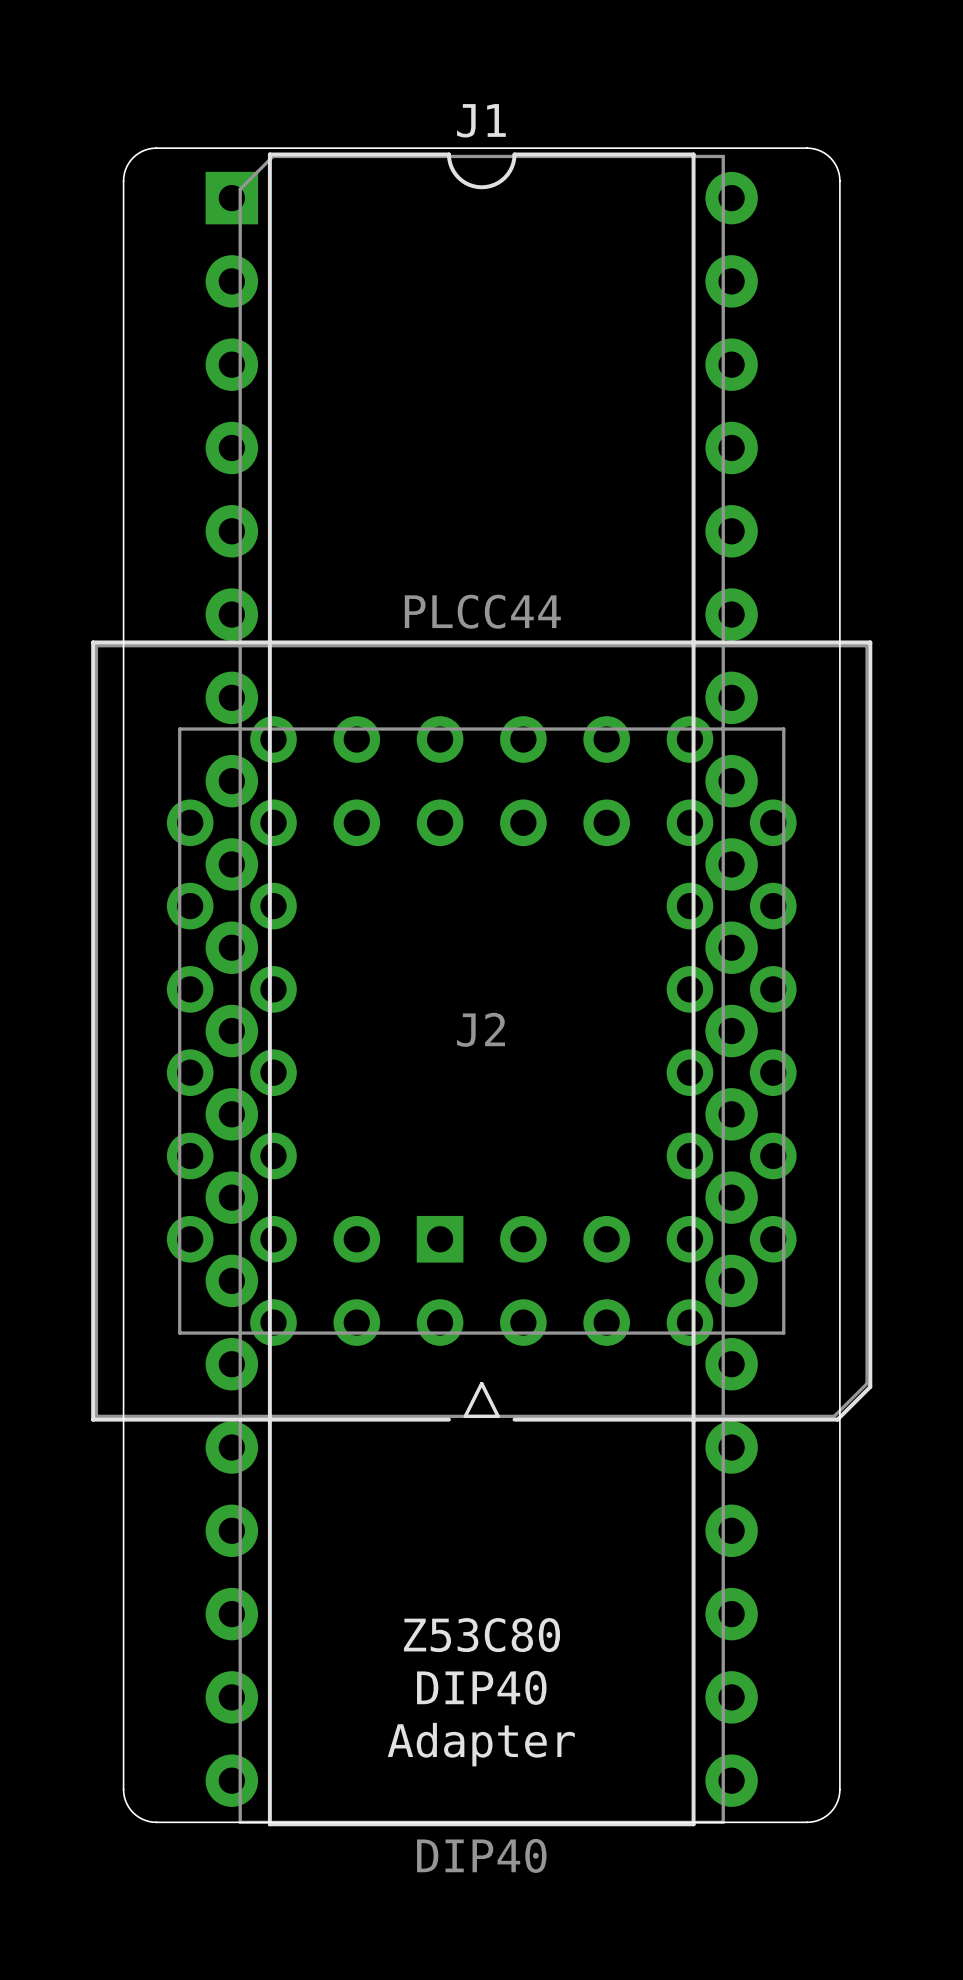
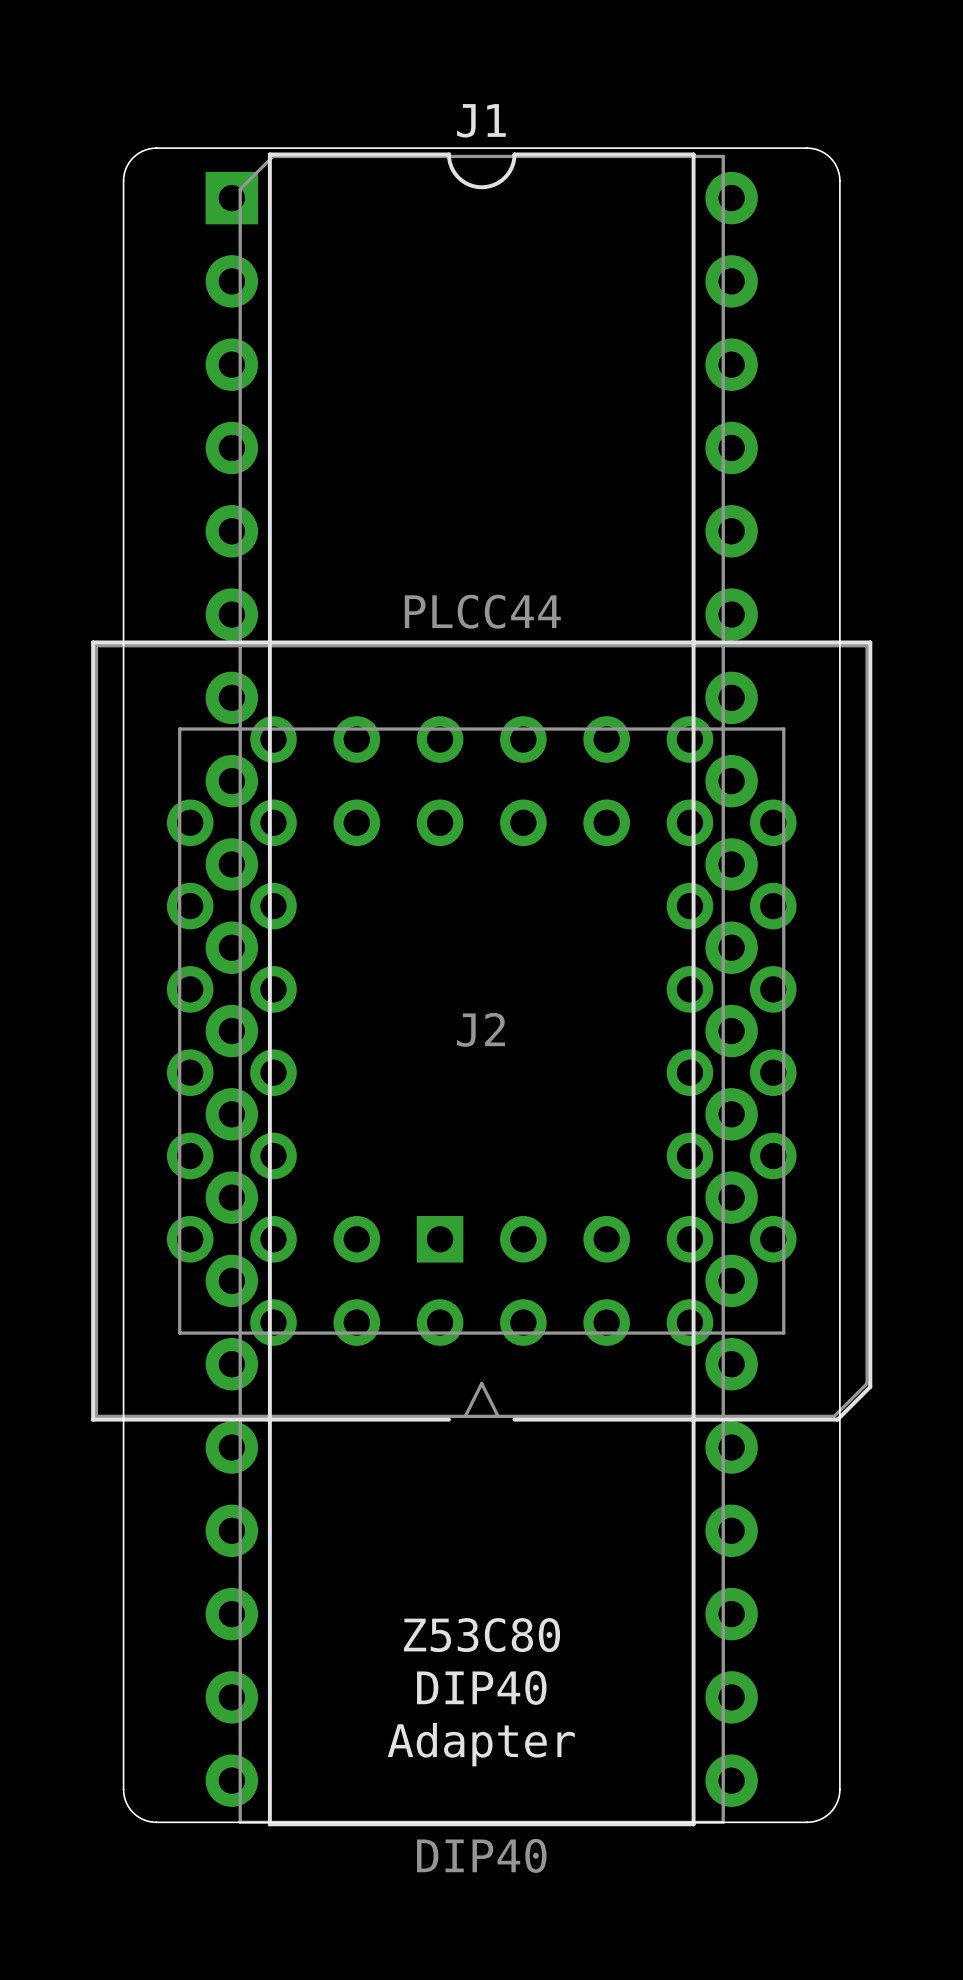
line: (481, 1383) (465, 1416) (498, 1416) (481, 1383) -> none

